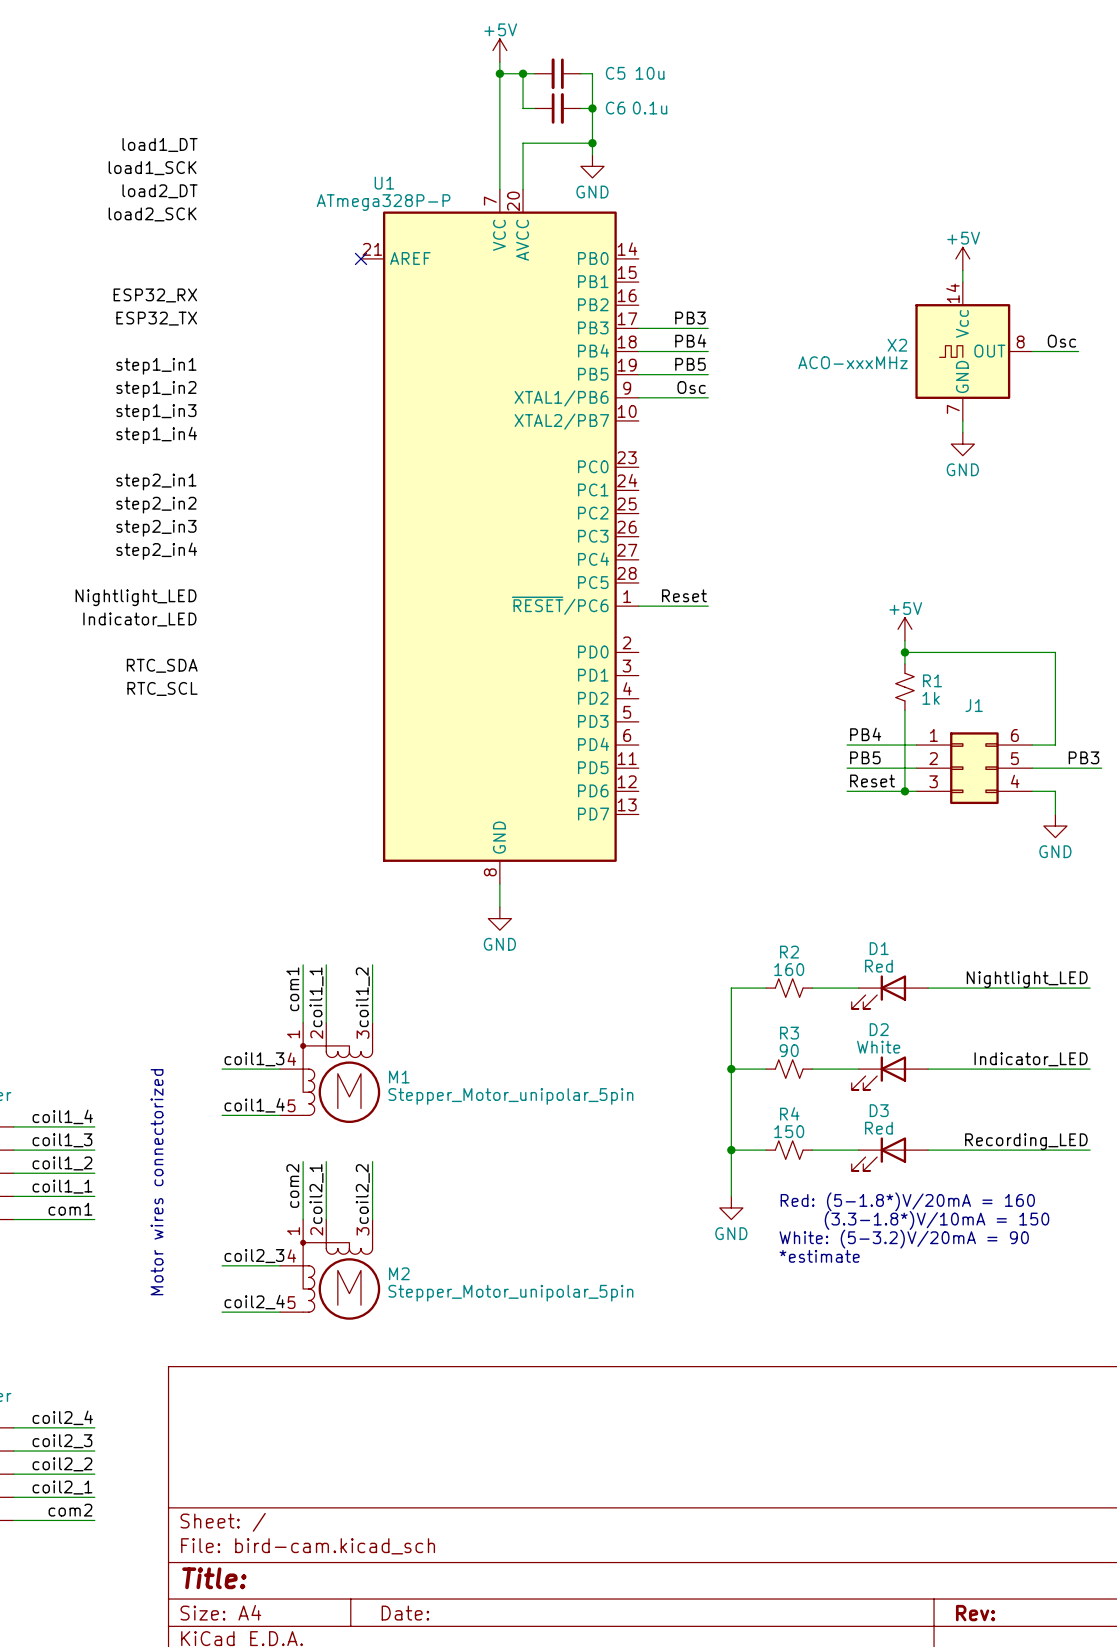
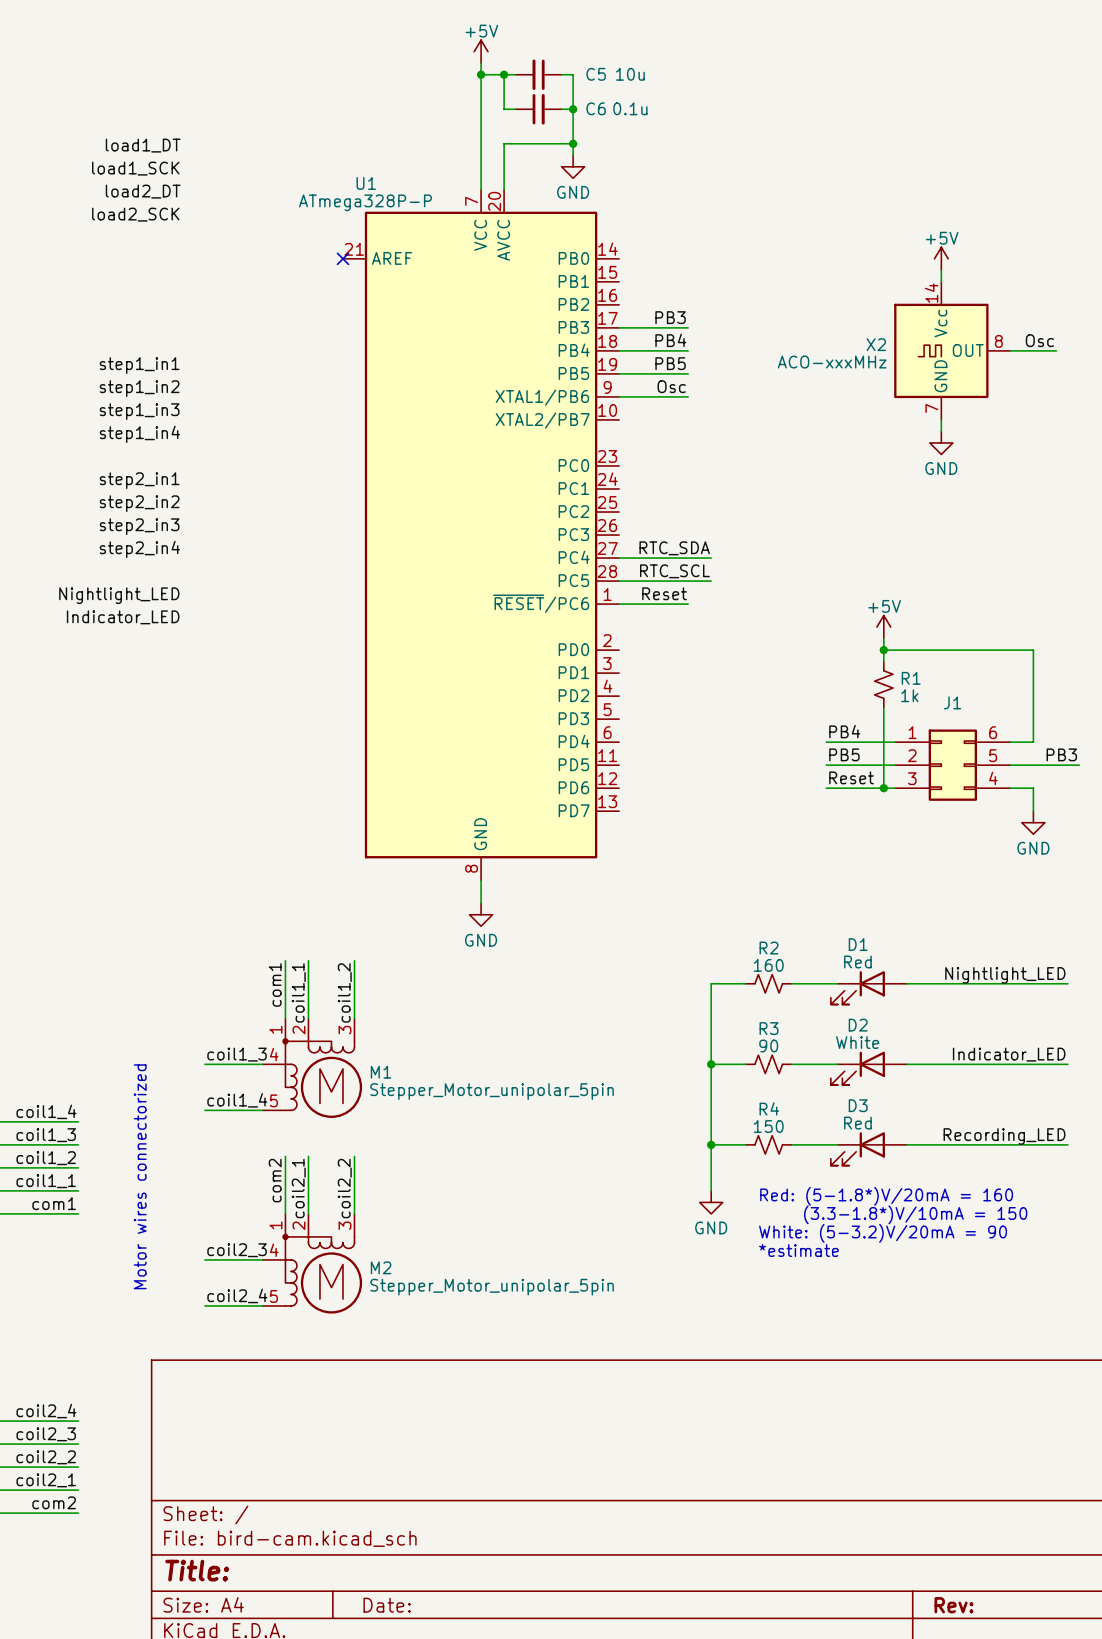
label: ESP32_RX (155, 295) -> none
label: ESP32_TX (156, 318) -> none
label: none -> RTC_SDA (674, 548)
wire: none -> (619, 558) (711, 558)
label: none -> RTC_SCL (674, 571)
wire: none -> (619, 581) (711, 581)
label: RTC_SDA (162, 665) -> none
label: RTC_SCL (162, 688) -> none

